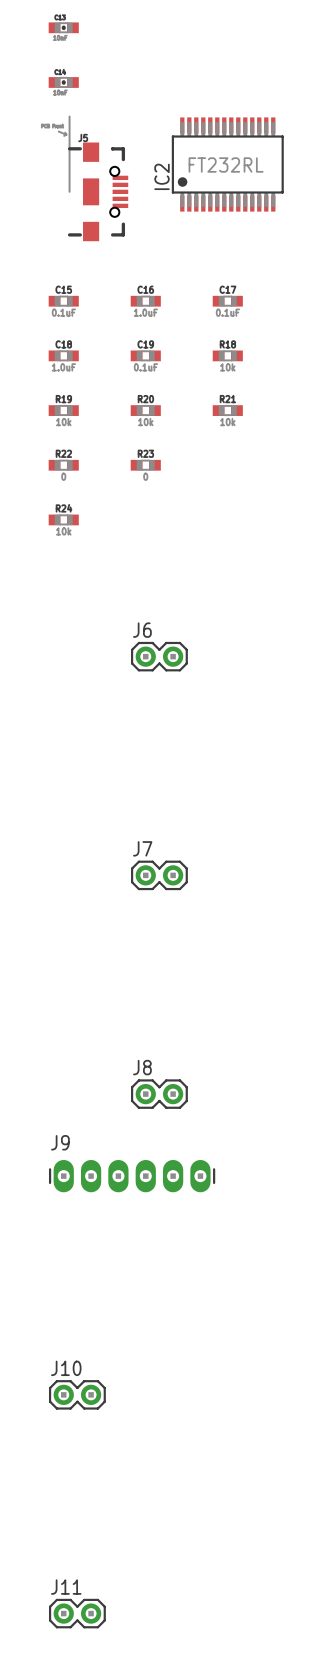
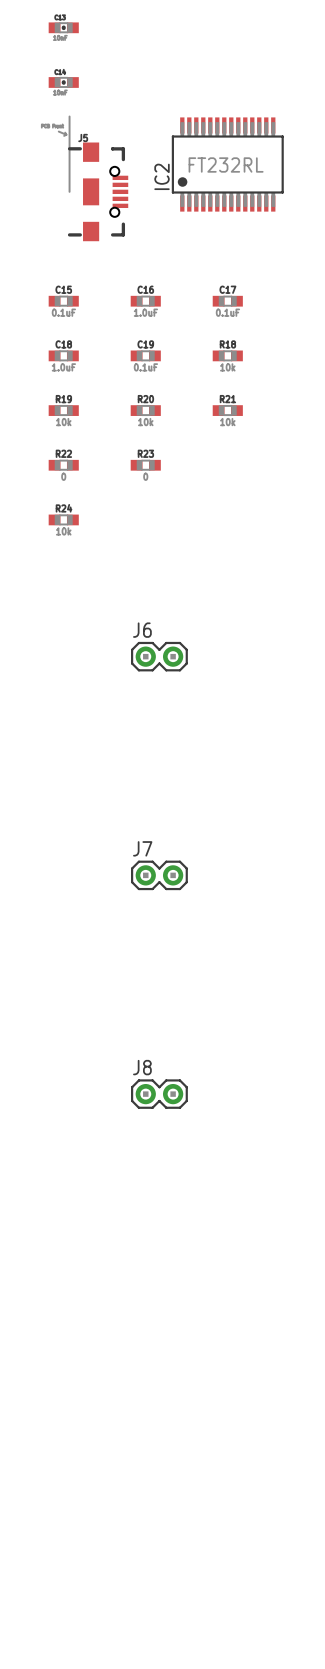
J9: (132, 1176) -> none
J10: (77, 1394) -> none
J11: (77, 1613) -> none

